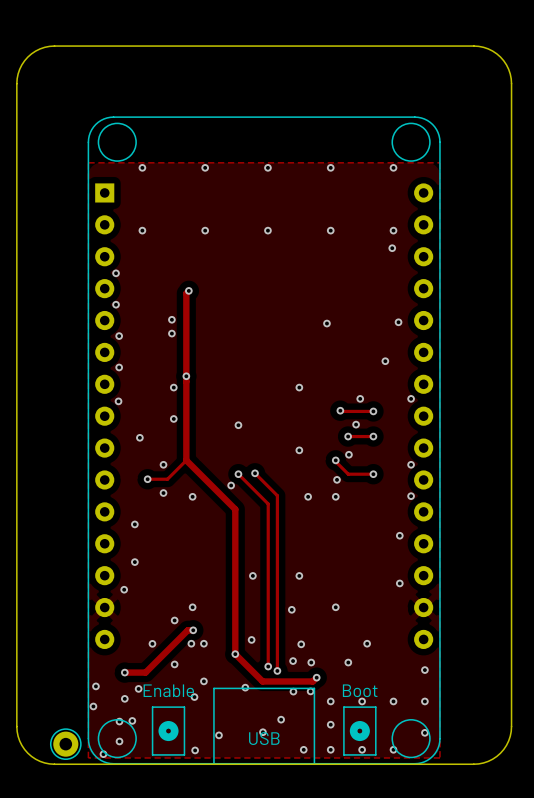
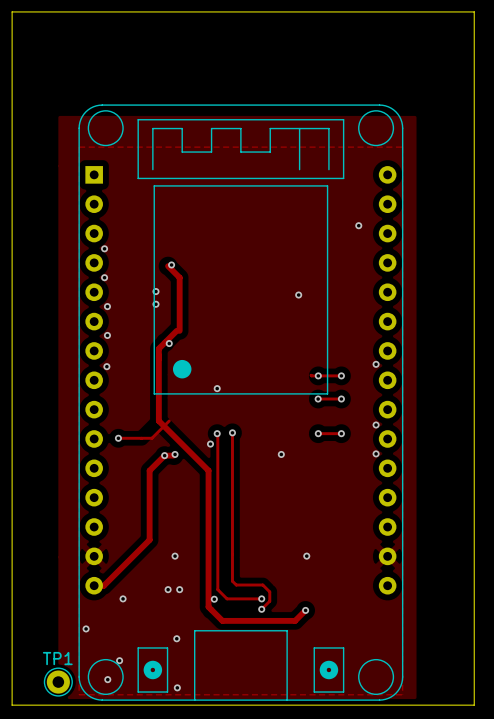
board edge: (54, 46) (473, 46) (492, 51) (506, 64) (511, 83) (511, 726) (506, 745) (492, 759) (473, 764) (54, 764) (35, 759) (21, 745) (16, 726) (16, 83) (19, 69) (27, 57) (40, 48) (54, 46) -> (12, 11) (12, 705) (474, 705) (474, 11) (12, 11)
part footprint: [87, 116, 441, 765] -> [78, 104, 404, 701]
via: (142, 167) -> none
via: (205, 167) -> none
via: (267, 167) -> none
via: (330, 167) -> none
via: (393, 167) -> none
via: (142, 230) -> none
via: (205, 230) -> none
via: (267, 230) -> none
via: (330, 230) -> none
via: (393, 230) -> none
track: (188, 290) (186, 293) (186, 460) (235, 509) (235, 654) (262, 681) (312, 681) (316, 677) -> none
track: none -> (168, 266) (179, 277) (179, 330)
via: (398, 322) -> none
via: (385, 361) -> none
track: none -> (176, 330) (158, 348) (158, 420) (208, 470) (208, 606) (222, 620) (295, 620) (305, 610)
via: (173, 387) -> none
via: (299, 387) -> none
via: (360, 398) -> none
via: (340, 410) -> none
via: none -> (318, 375)
via: (173, 418) -> none
via: (356, 424) -> none
via: (139, 437) -> none
via: (299, 450) -> none
via: (348, 454) -> none
track: (335, 460) (348, 474) -> none
via: (335, 460) -> none
via: (163, 464) -> none
track: (255, 473) (277, 495) (277, 670) -> (232, 432) (232, 581) (236, 585) (262, 585) (269, 591) (269, 601) (261, 609)
track: (239, 474) (268, 503) (268, 666) -> (217, 434) (217, 589) (227, 598) (261, 598)
via: none -> (318, 433)
track: none -> (118, 438) (133, 438)
via position: (147, 479) -> (118, 438)
via: (337, 479) -> none
via: (163, 493) -> none
via: (335, 496) -> none
via: none -> (164, 455)
track: none -> (173, 455) (164, 455) (149, 470) (149, 539) (103, 585) (94, 585)
via: (134, 524) -> none
via: (399, 535) -> none
via: (134, 562) -> none
via: (252, 575) -> none
via: (299, 575) -> none
via: (399, 583) -> none
via: (124, 589) -> none
via: (291, 609) -> none
via: (174, 620) -> none
track: (193, 630) (187, 630) (145, 672) (124, 672) -> none
via: (193, 630) -> none
via: (251, 639) -> none
via: (152, 643) -> none
via: none -> (168, 589)
via: (191, 643) -> none
via: none -> (179, 589)
via: (203, 643) -> none
via: (367, 643) -> none
via: (301, 644) -> none
via: none -> (123, 598)
via: none -> (261, 598)
via: (293, 661) -> none
via: (311, 662) -> none
via: (348, 662) -> none
via: (174, 664) -> none
via: none -> (261, 609)
via: (268, 666) -> none
via: none -> (305, 610)
via: (277, 670) -> none
via: (424, 670) -> none
via: (124, 672) -> none
via: (316, 677) -> none
via: (203, 681) -> none
via: (245, 687) -> none
via: (138, 688) -> none
via: (293, 691) -> none
via: (310, 691) -> none
via: (124, 698) -> none
via: (330, 701) -> none
via: (362, 701) -> none
via: (393, 701) -> none
via: (424, 701) -> none
via: (93, 706) -> none
TP1 name: none -> TP1 (57, 658)
via: (281, 719) -> none
via: (119, 721) -> none
via: (330, 724) -> none
via: (262, 732) -> none
via: (424, 732) -> none
via: (218, 735) -> none
via: (303, 749) -> none
via: (330, 749) -> none
via: (362, 749) -> none
via: (393, 749) -> none
via: (103, 754) -> none

